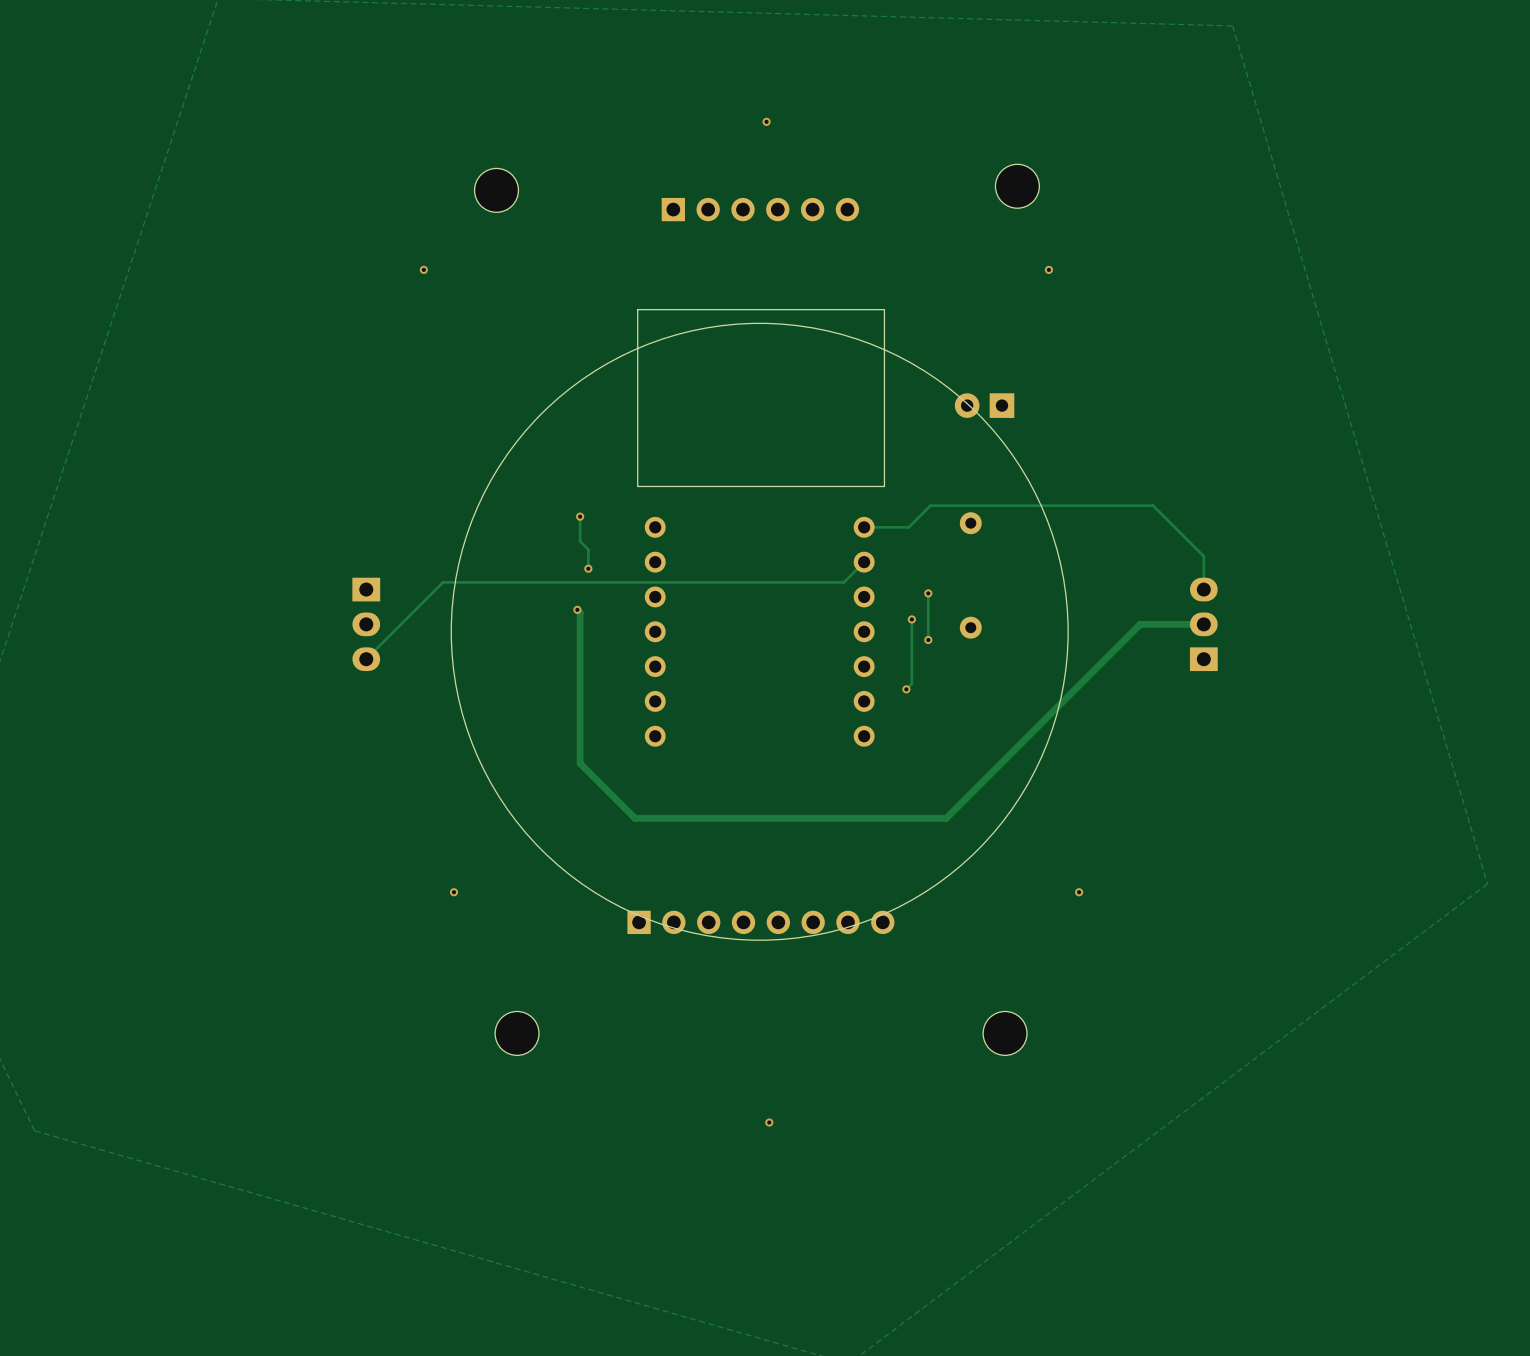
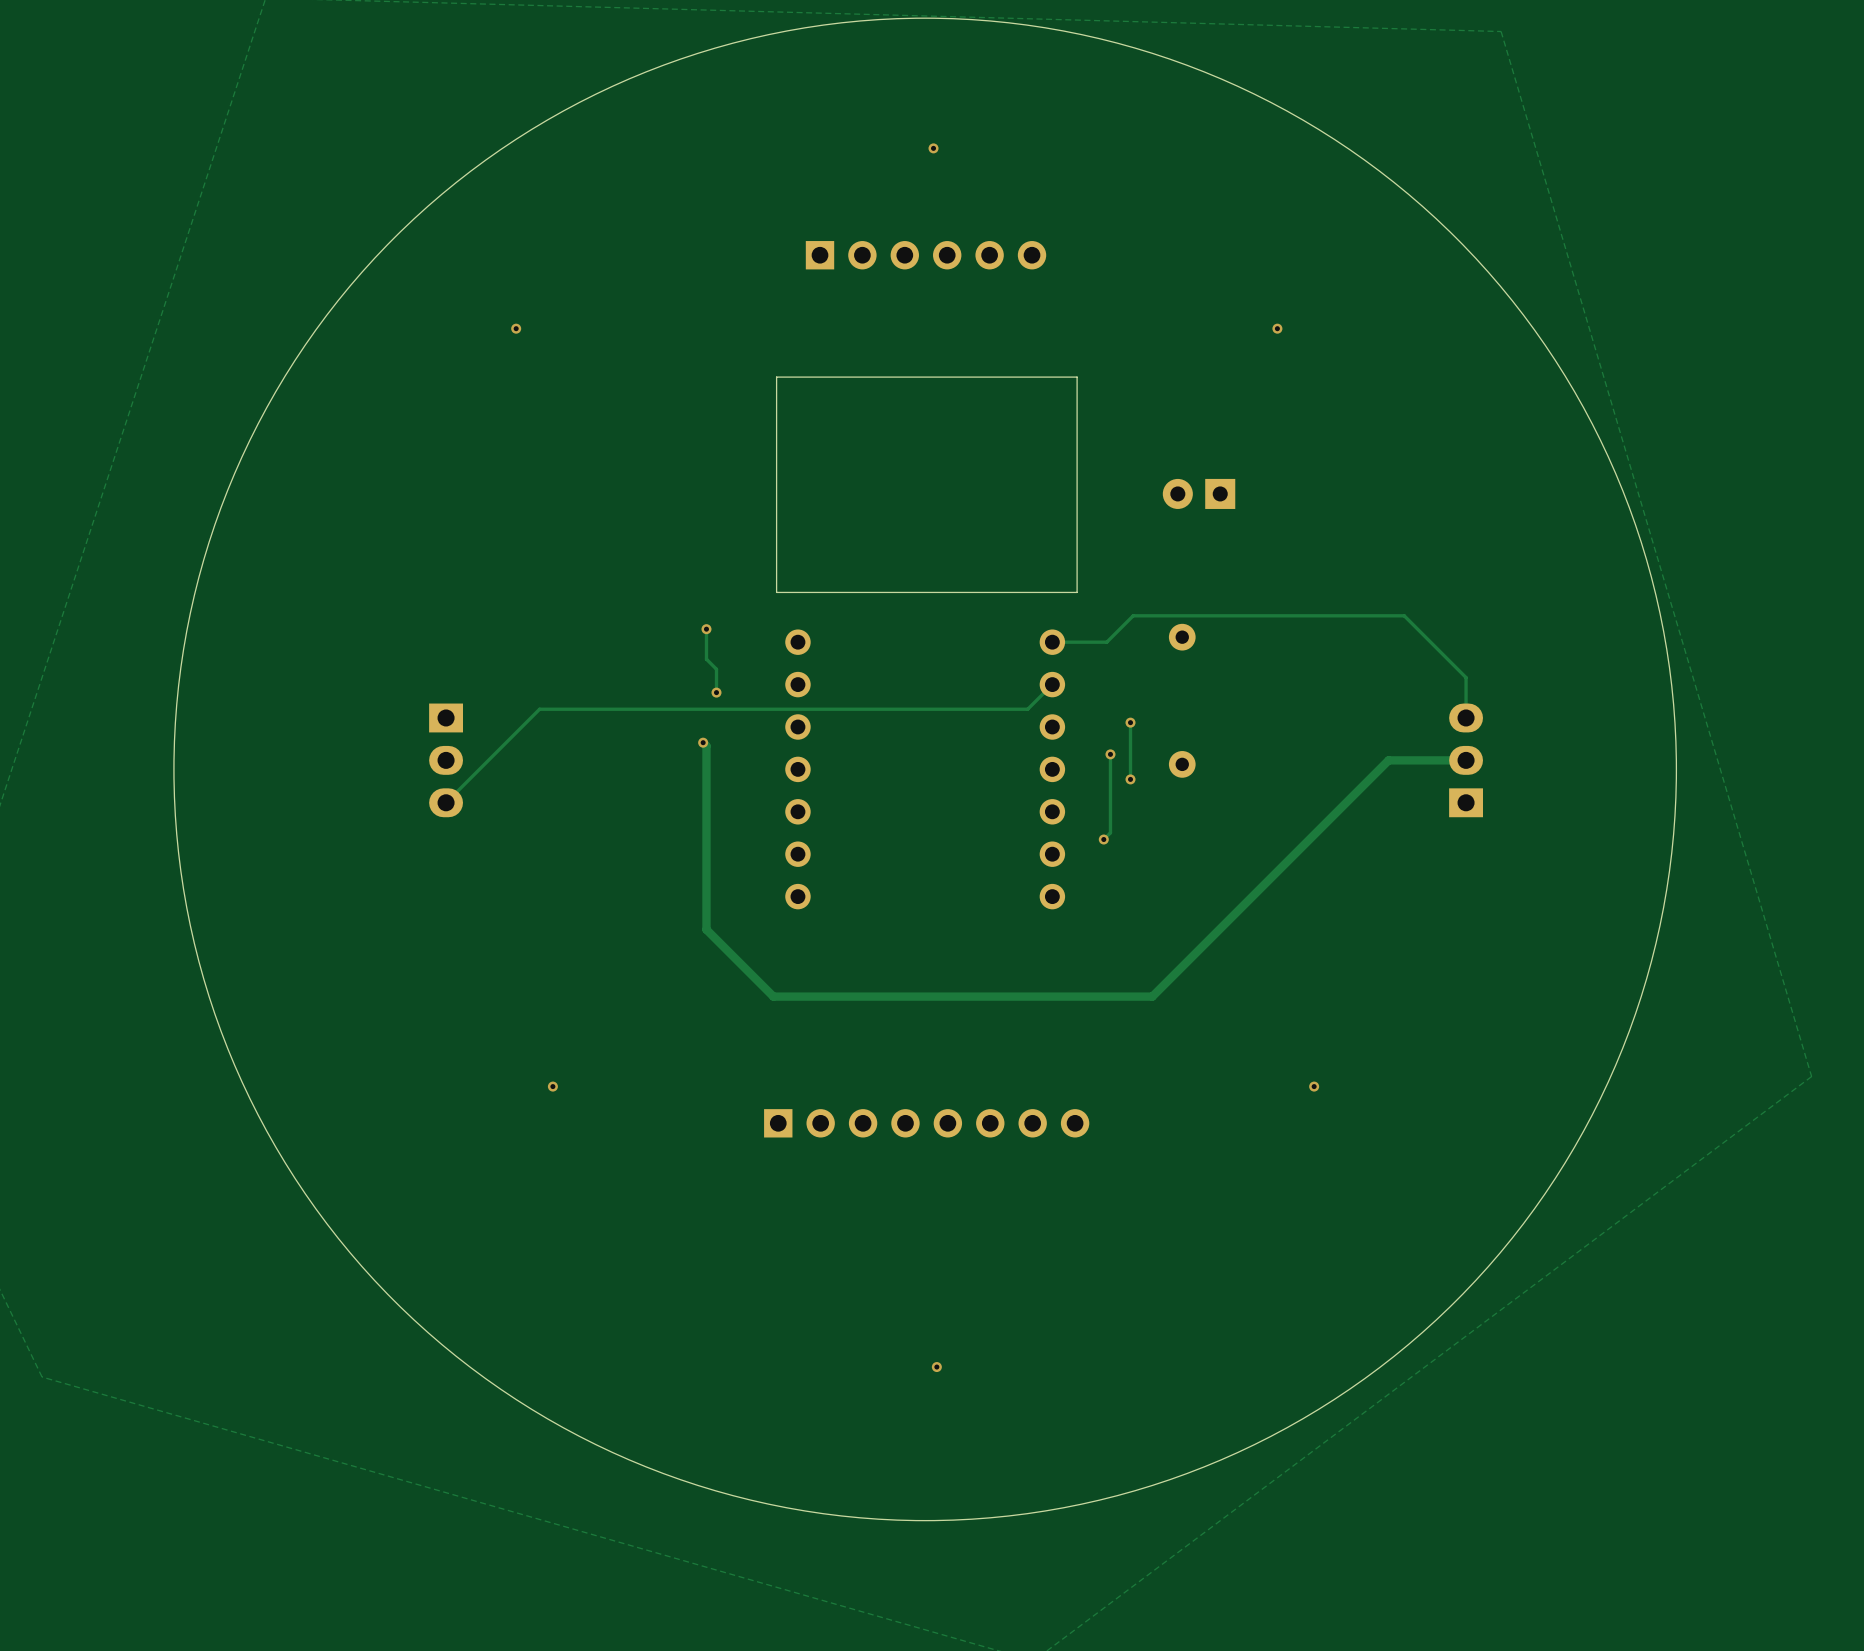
part: (1017, 186) -> none
part: (496, 190) -> none
round board edge size: [450, 323, 1069, 941] -> [173, 17, 1677, 1522]
part: (517, 1033) -> none
part: (1005, 1033) -> none

